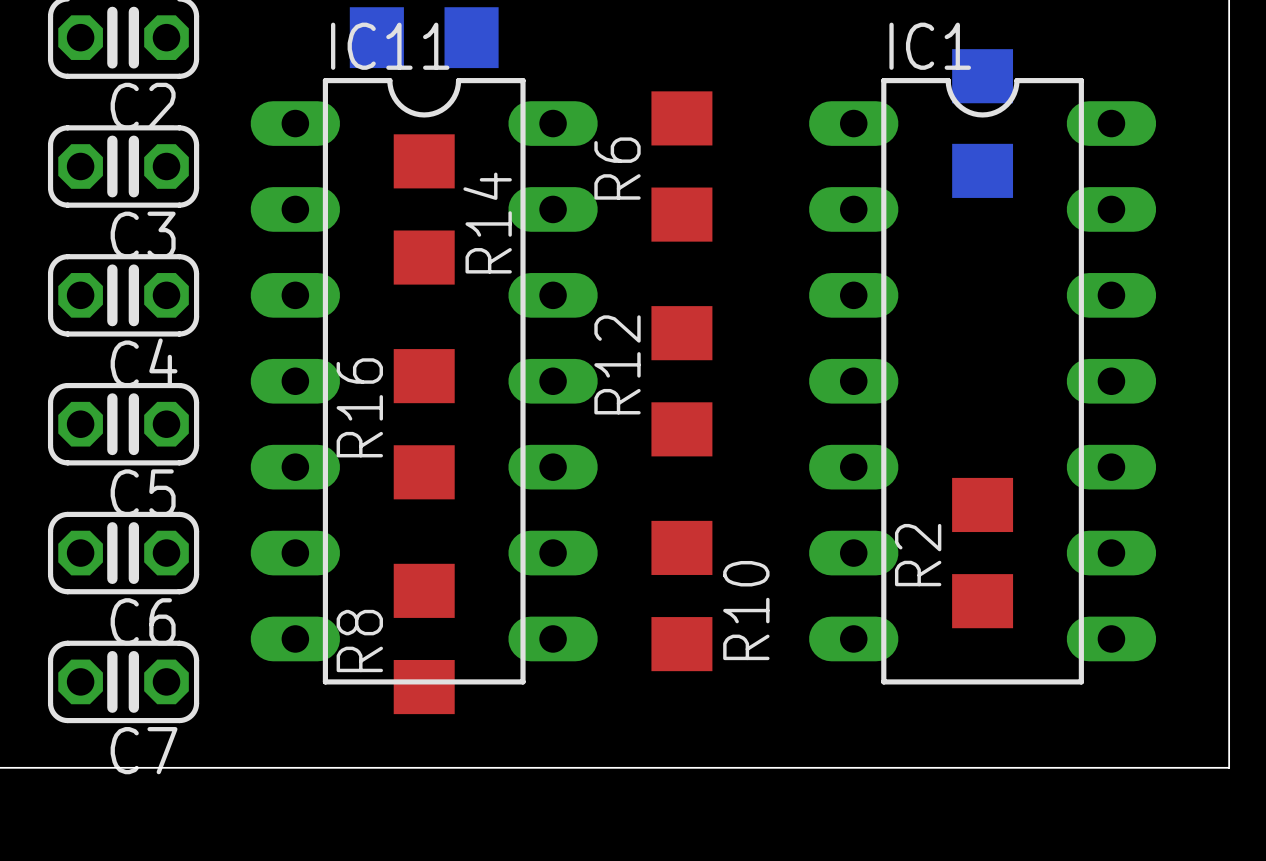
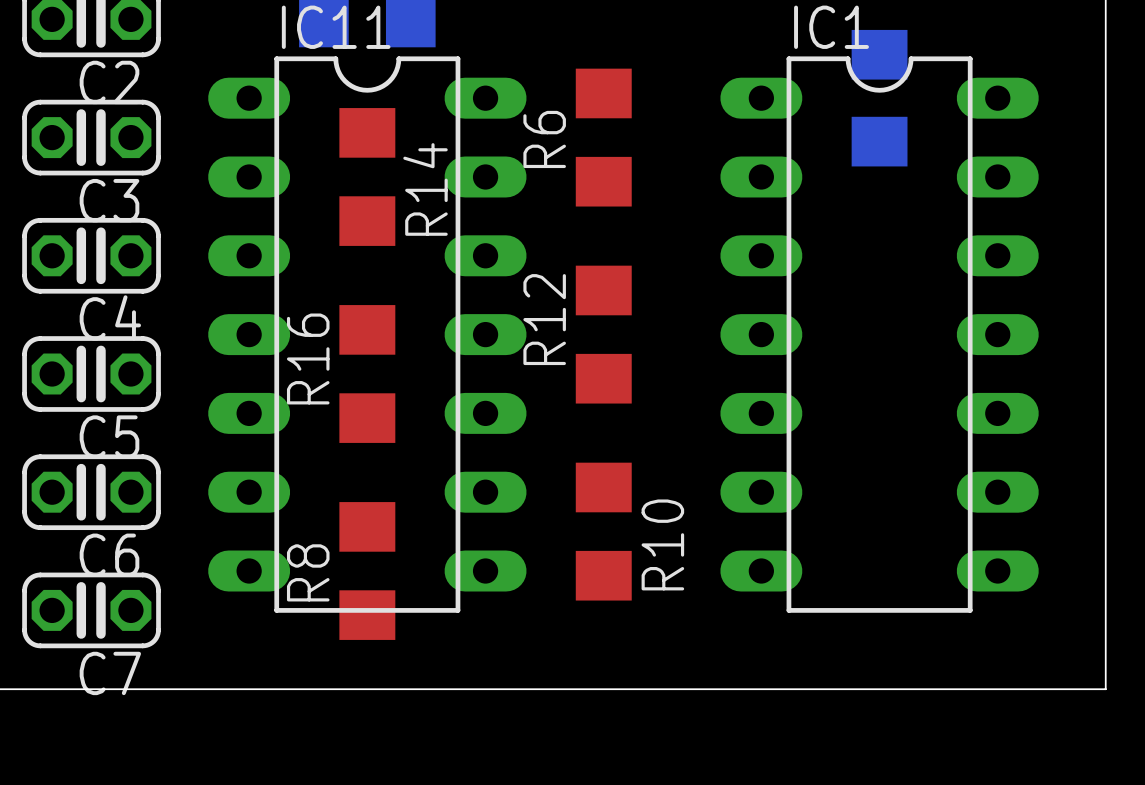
R2: (982, 553) -> none

